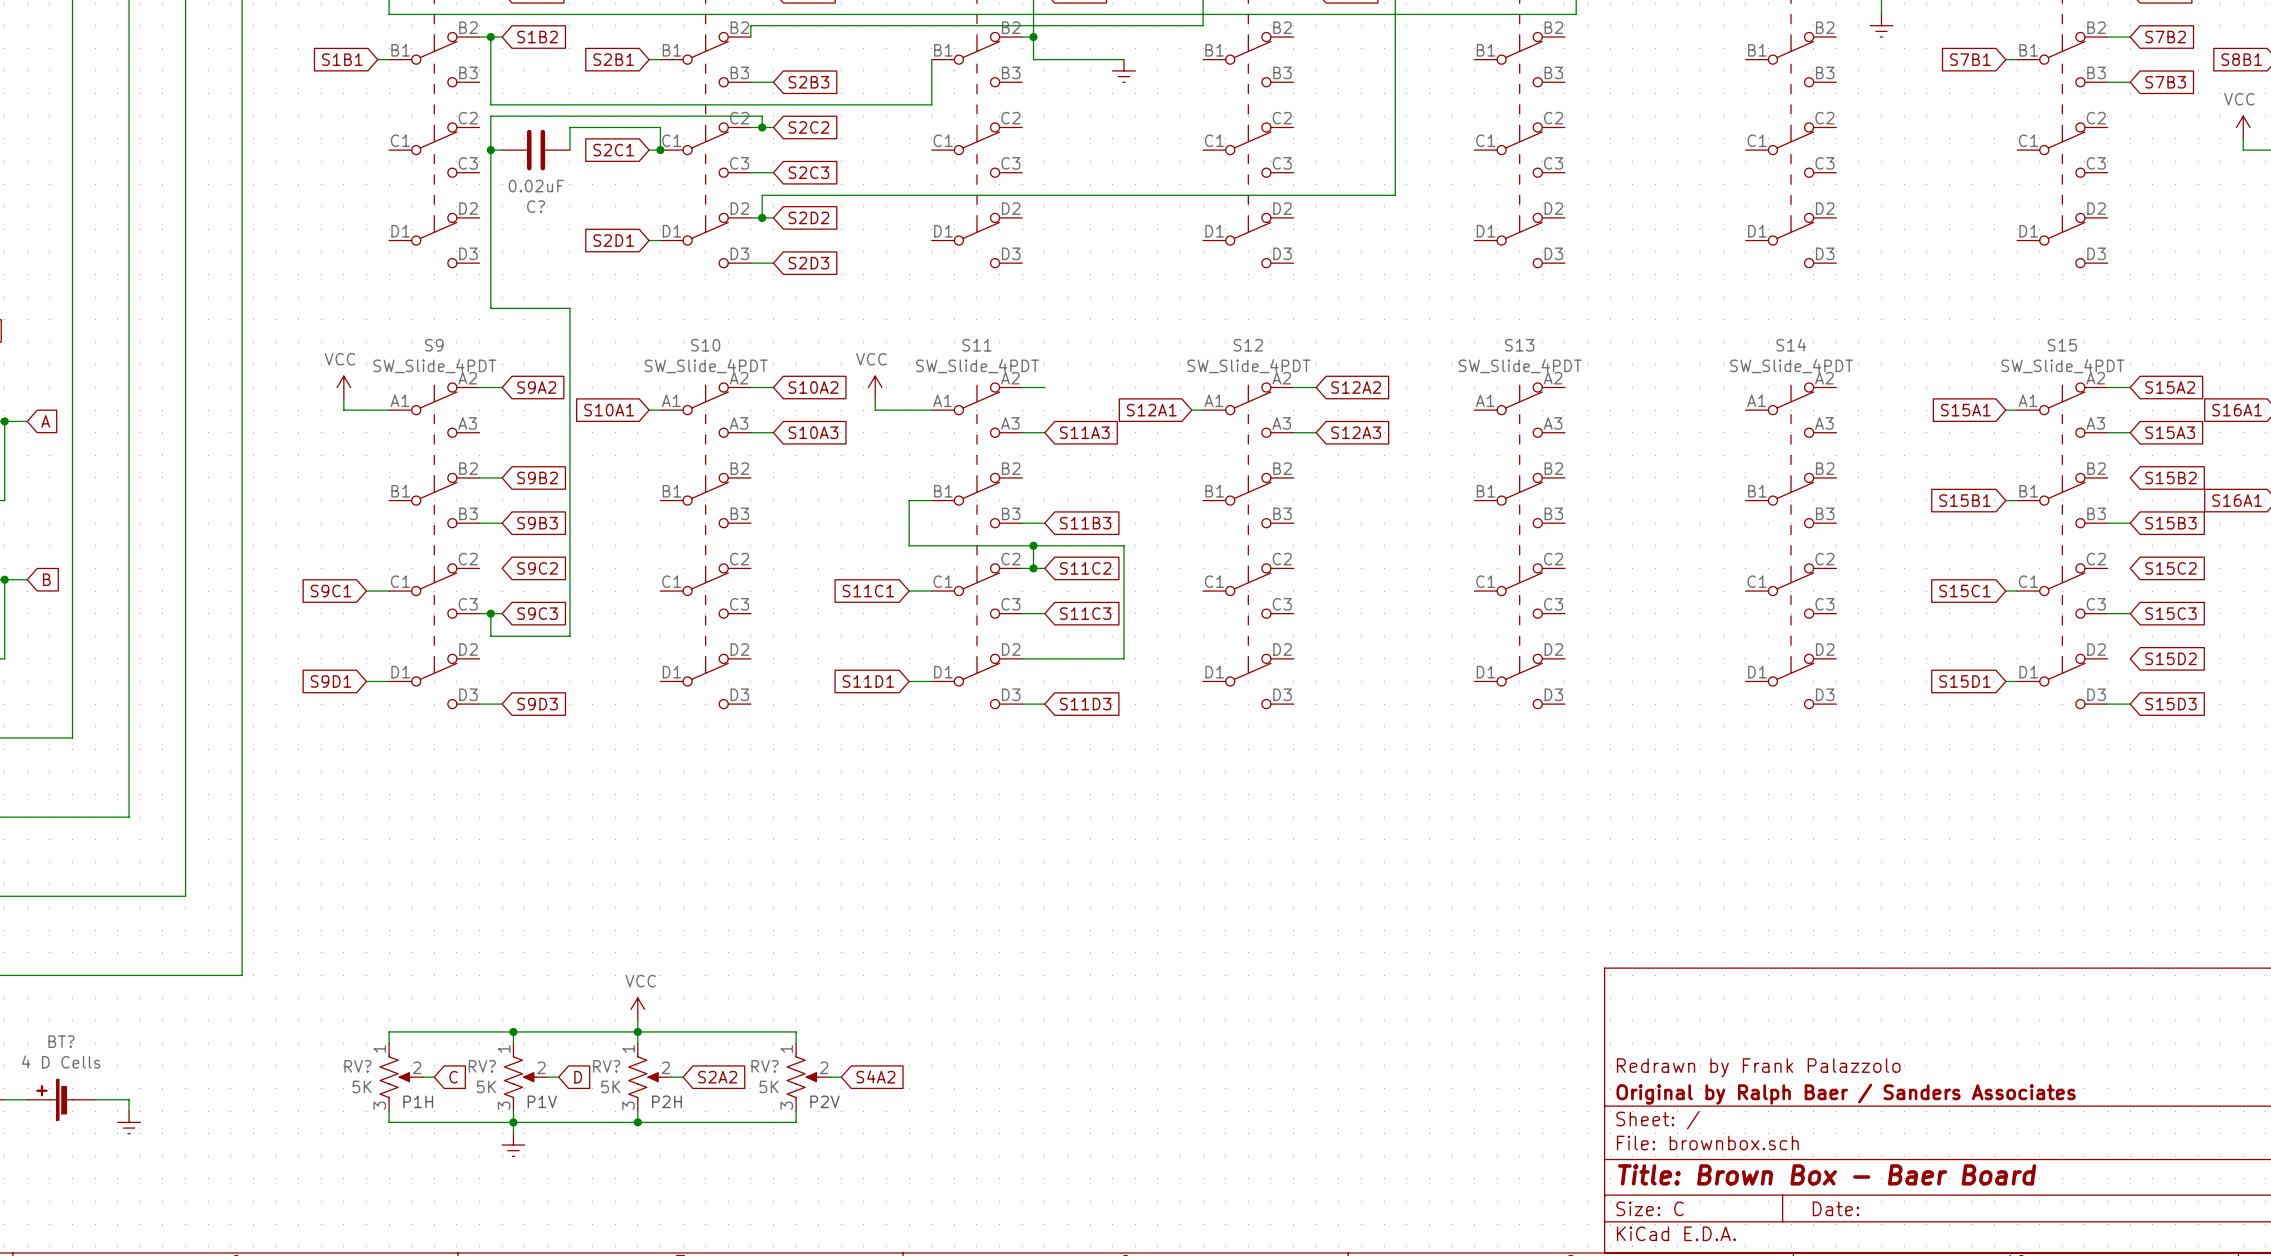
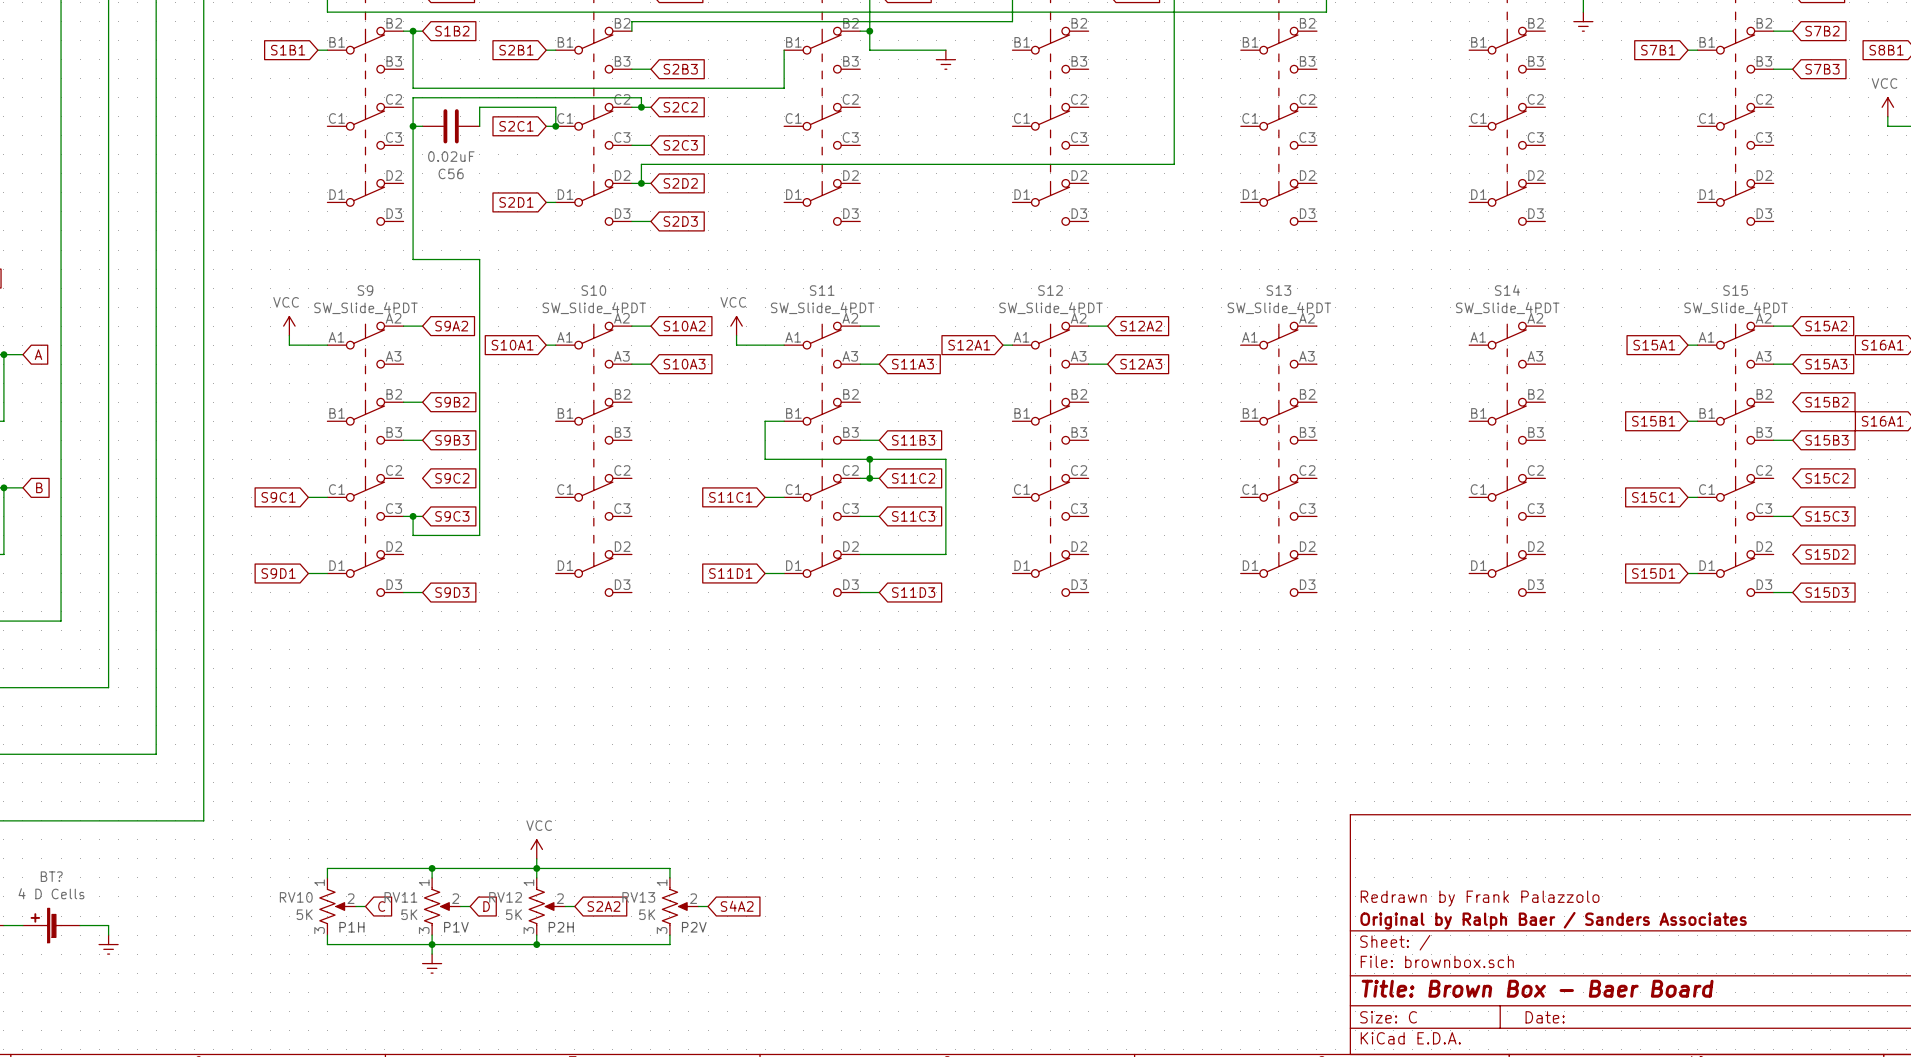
C? name: C? (536, 206) -> C56 (451, 173)
RV? name: RV? (357, 1066) -> RV10 (296, 897)
RV? name: RV? (482, 1066) -> RV11 (400, 897)
RV? name: RV? (606, 1066) -> RV12 (505, 897)
RV? name: RV? (764, 1066) -> RV13 (638, 897)

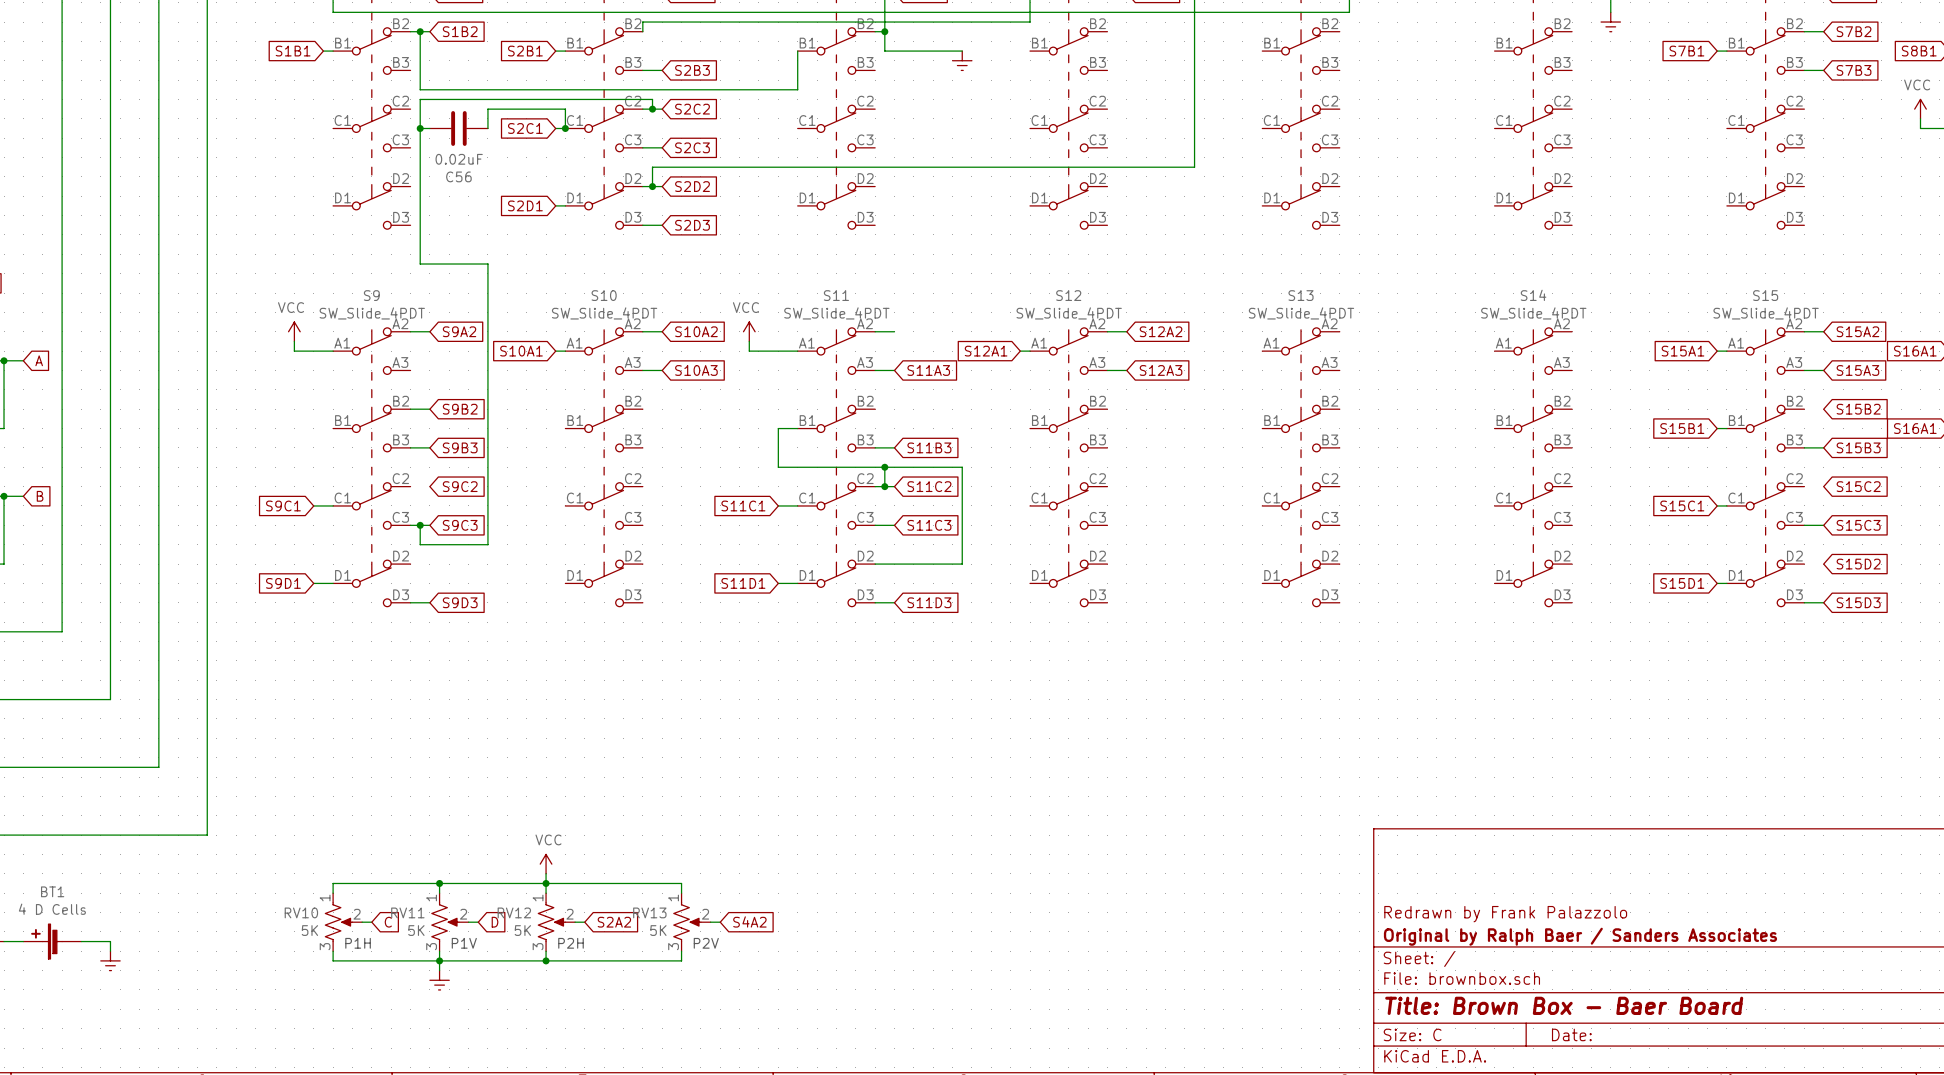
BT? name: BT? (51, 876) -> BT1 (52, 891)

